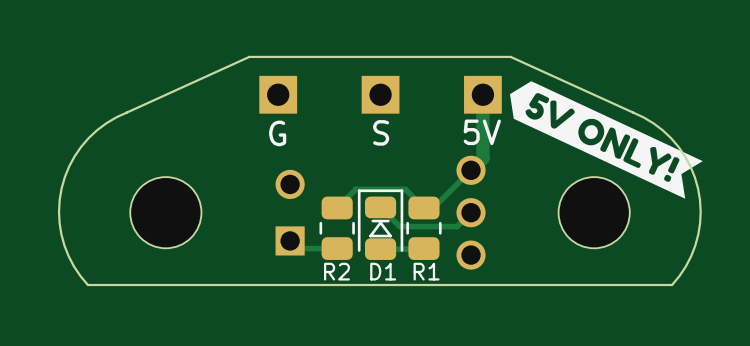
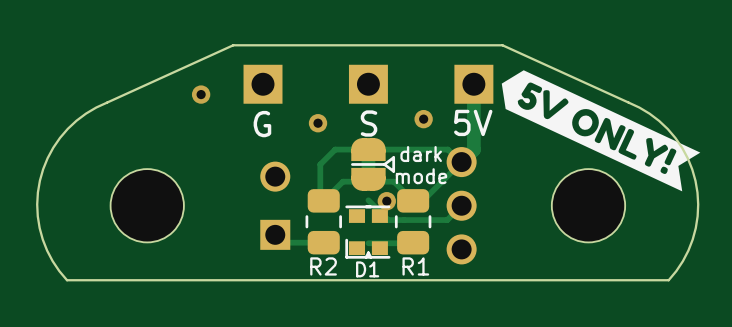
via: none -> (201, 94)
via: none -> (423, 119)
via: none -> (318, 123)
text: none -> dark (421, 154)
part: none -> (373, 164)
track: none -> (467, 169) (447, 149) (335, 149) (320, 164) (320, 200)
text: none -> mode (421, 176)
D1 footprint: [357, 189, 404, 260] -> [345, 205, 391, 259]
via: none -> (386, 201)

